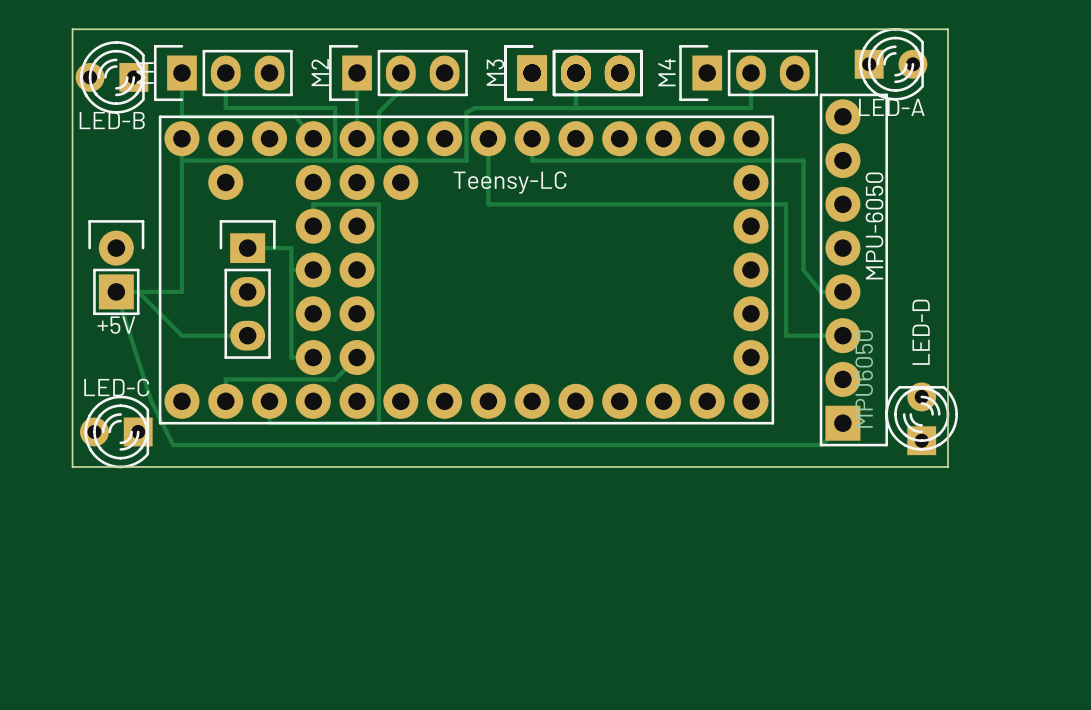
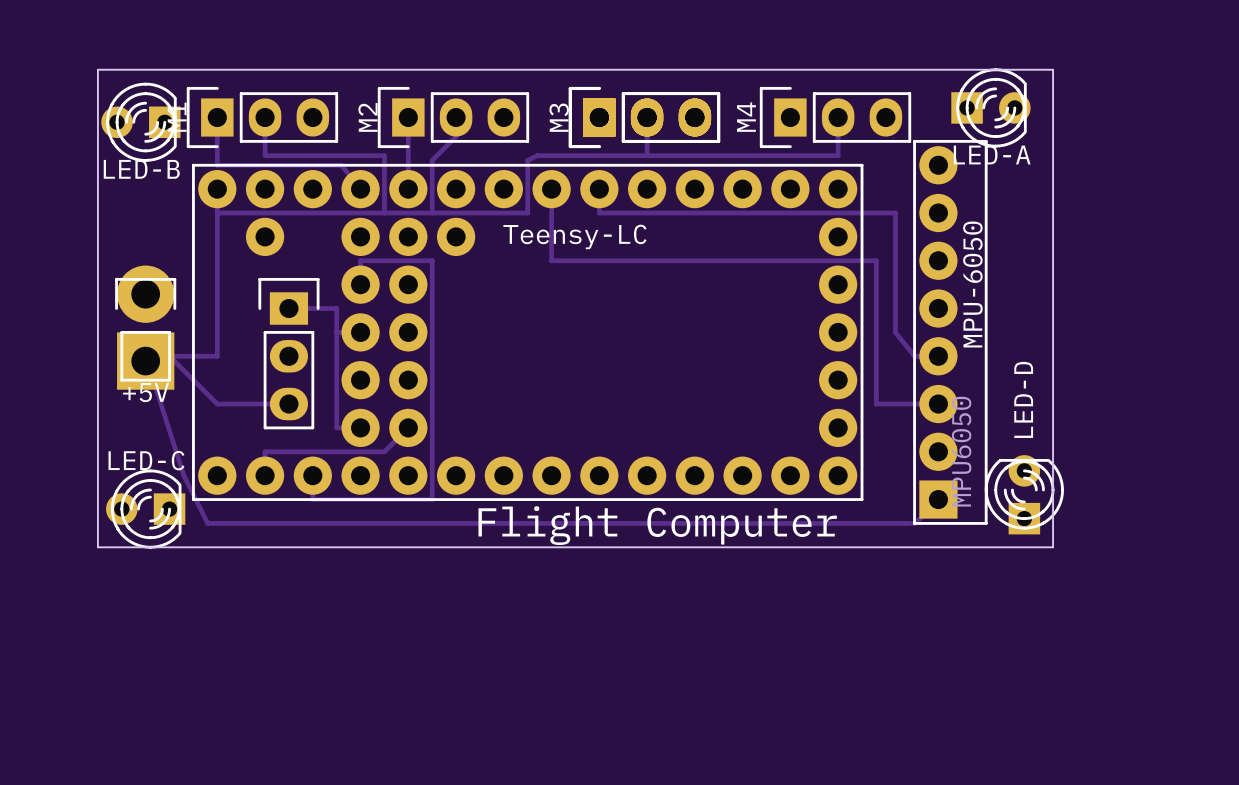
+5V footprint: [88, 220, 145, 316] -> [115, 265, 177, 390]
text: none -> Flight Computer (657, 525)

